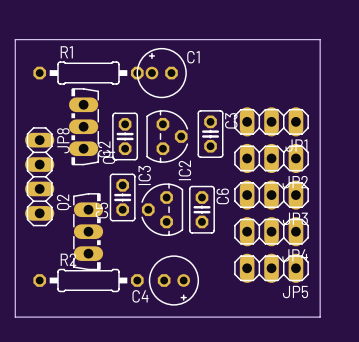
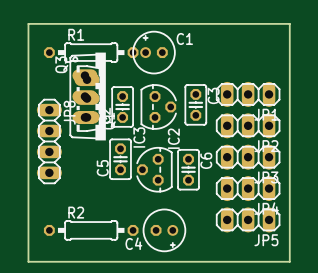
Q3: none -> (87, 96)
Q2: (88, 231) -> none

